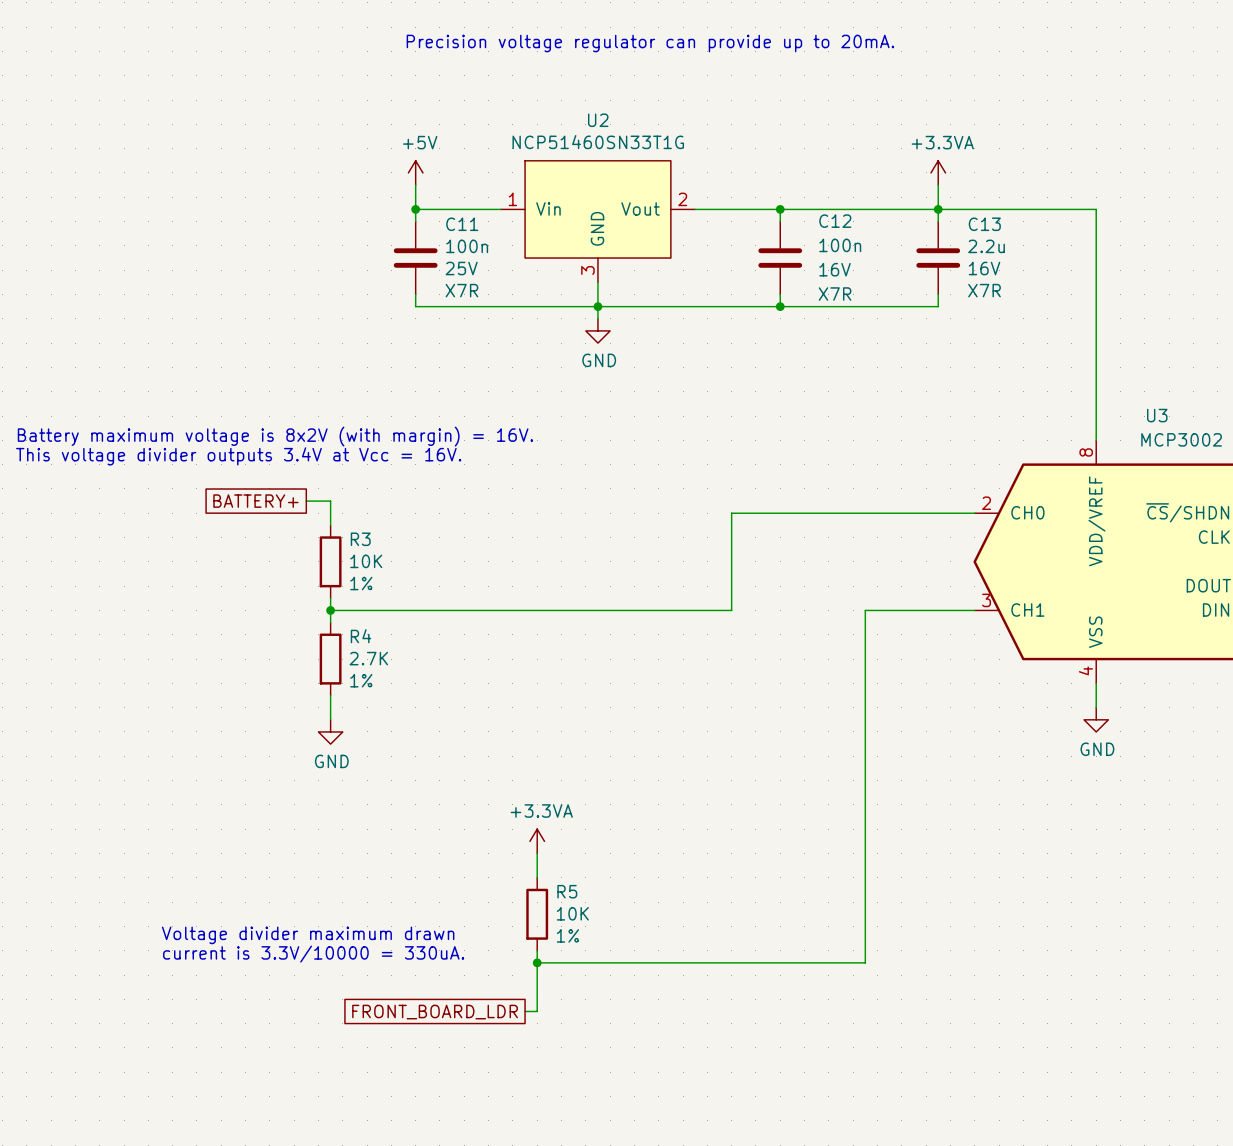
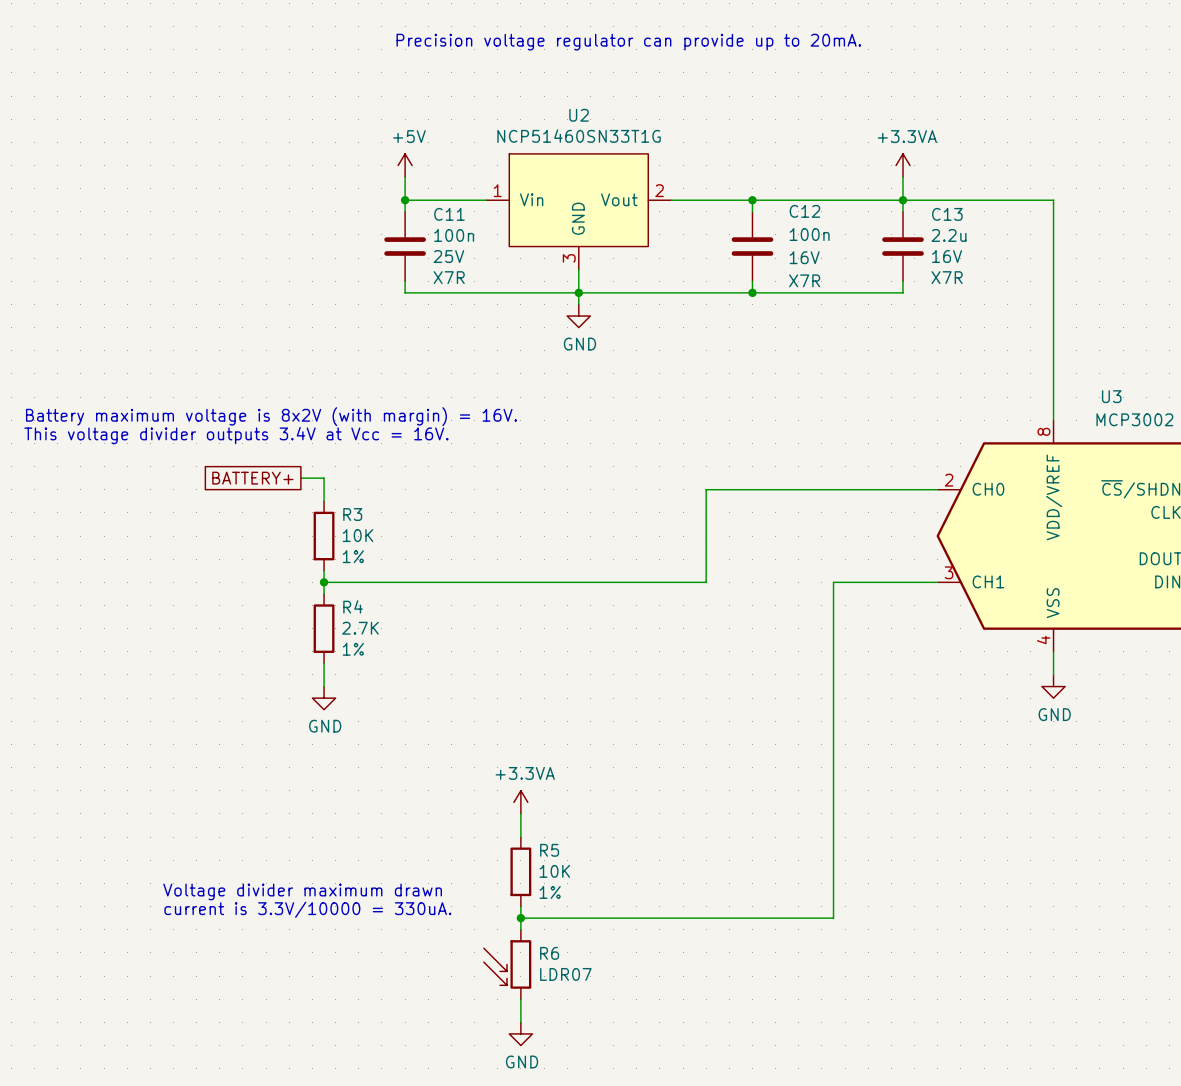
wire: (537, 975) (537, 1011) (525, 1011) -> none
R6: none -> LDR07 (507, 964)
global label: FRONT_BOARD_LDR (435, 1012) -> none
wire: none -> (520, 999) (520, 1022)
power symbol: none -> GND (520, 1033)

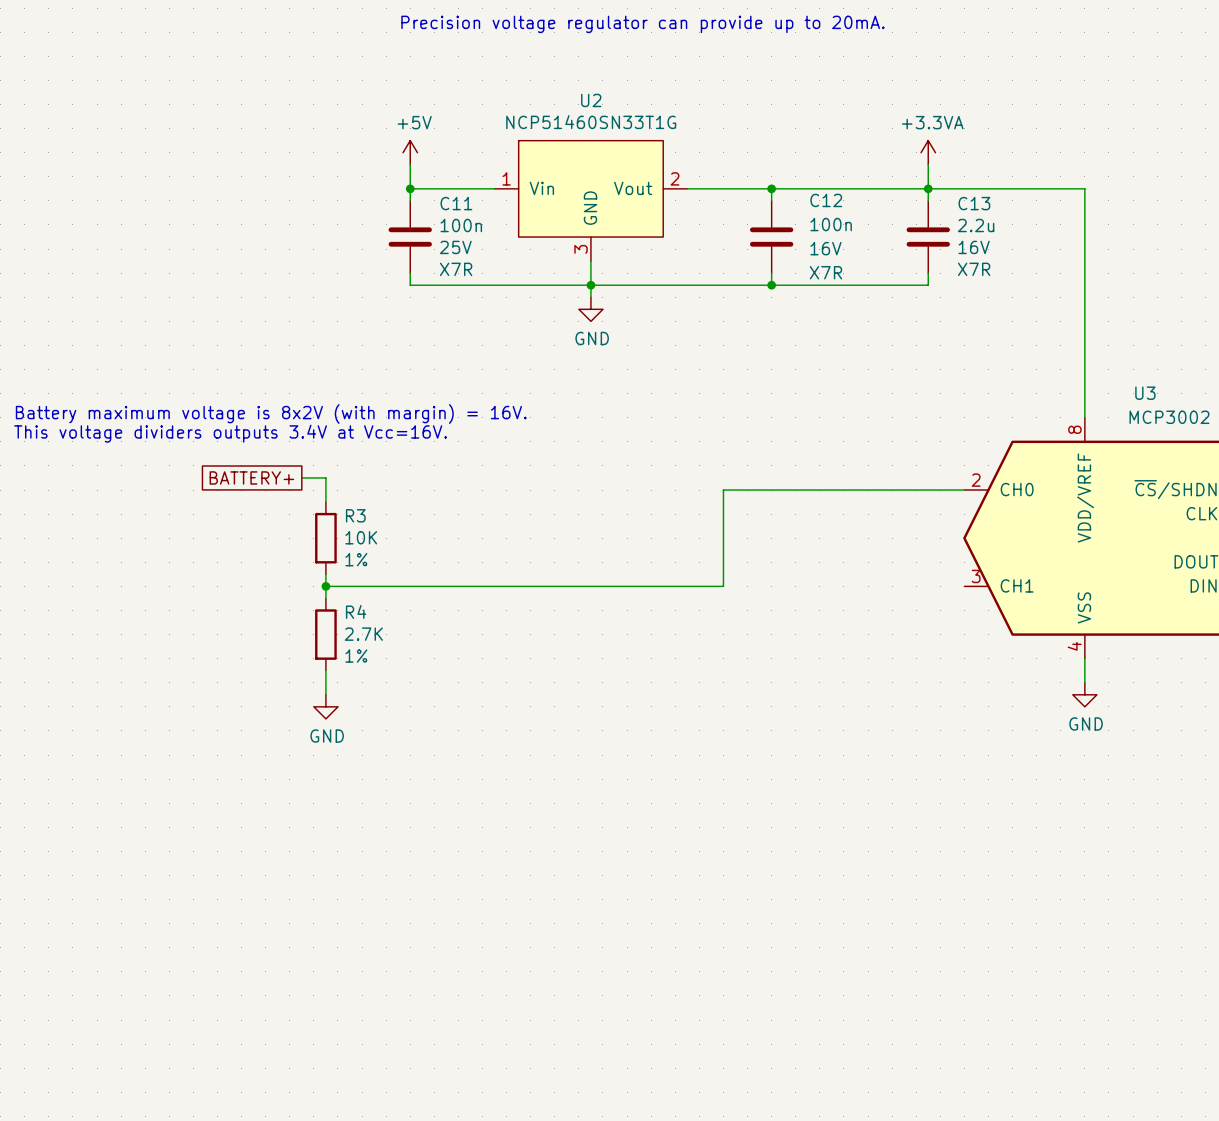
text: This voltage divider outputs 3.4V at Vcc = 16V. (236, 435) -> This voltage dividers outputs 3.4V at Vcc=16V. (230, 433)
wire: (937, 582) (833, 582) (833, 918) (520, 918) -> none
power symbol: +3.3VA (520, 802) -> none
wire: (520, 813) (520, 837) -> none
R5: 10K (520, 871) -> none
text: Voltage divider maximum drawn (302, 891) -> none
wire: (520, 906) (520, 929) -> none
text: current is 3.3V/10000 = 330uA. (307, 909) -> none
junction: (520, 918) -> none
R6: LDR07 (507, 964) -> none
wire: (520, 999) (520, 1022) -> none
power symbol: GND (520, 1033) -> none

